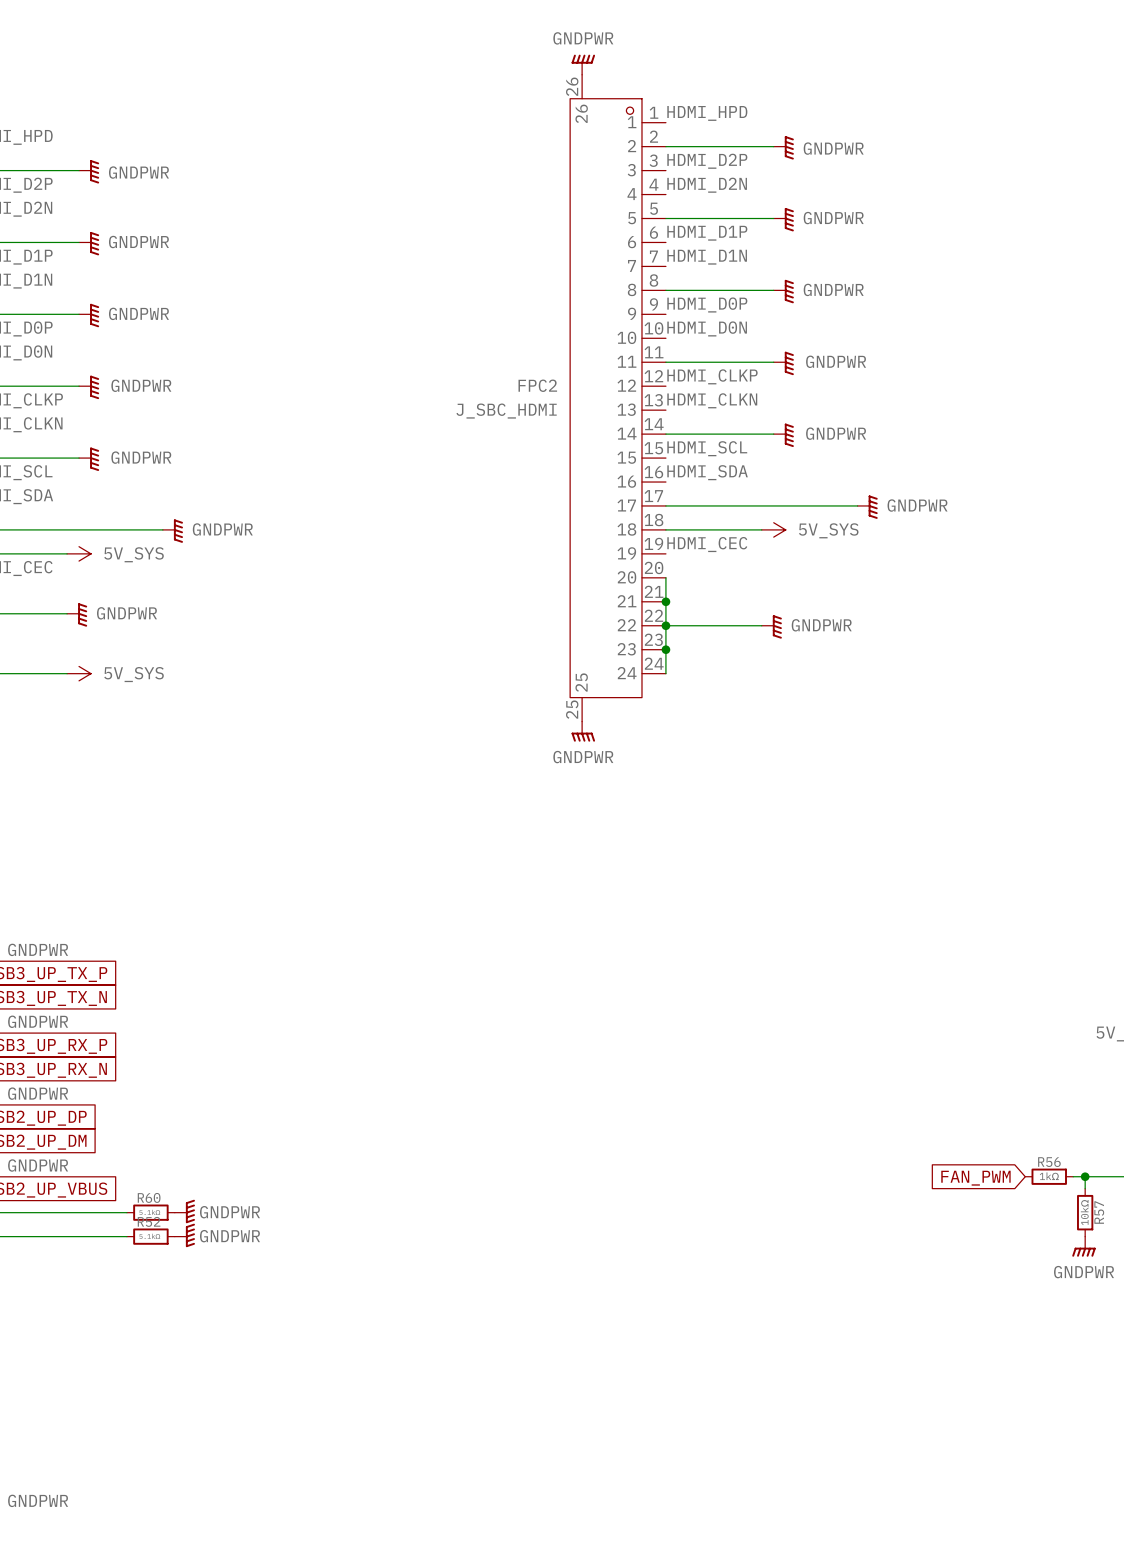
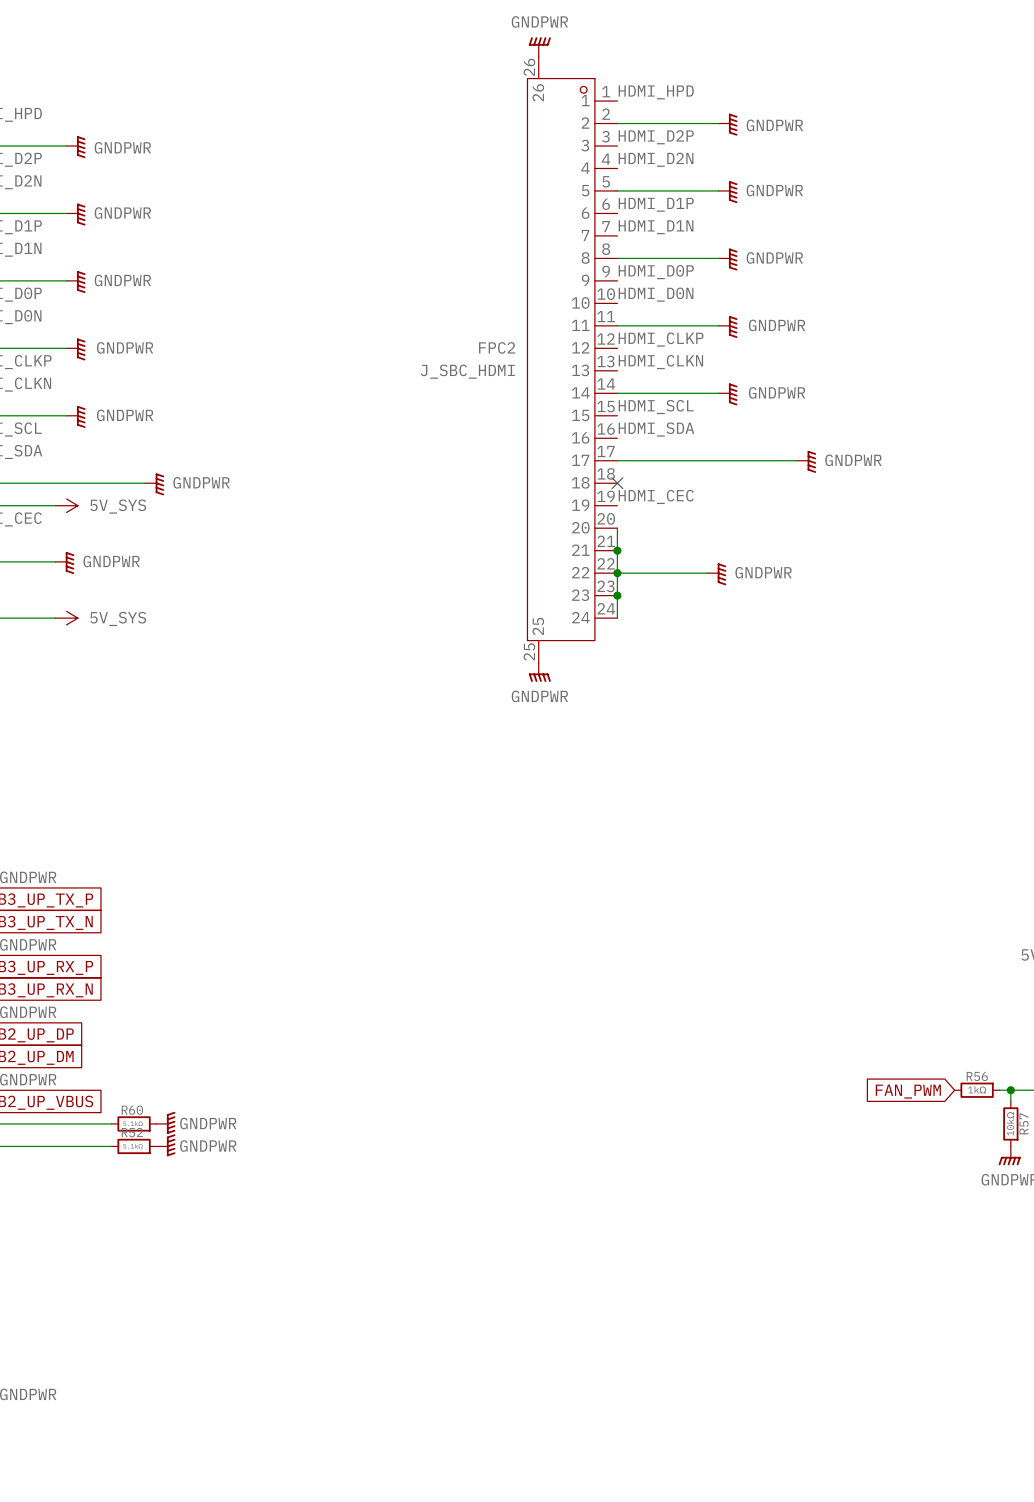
wire: (665, 529) (761, 529) -> none
no-connect mark: none -> (617, 483)
power symbol: 5V_SYS (773, 529) -> none

